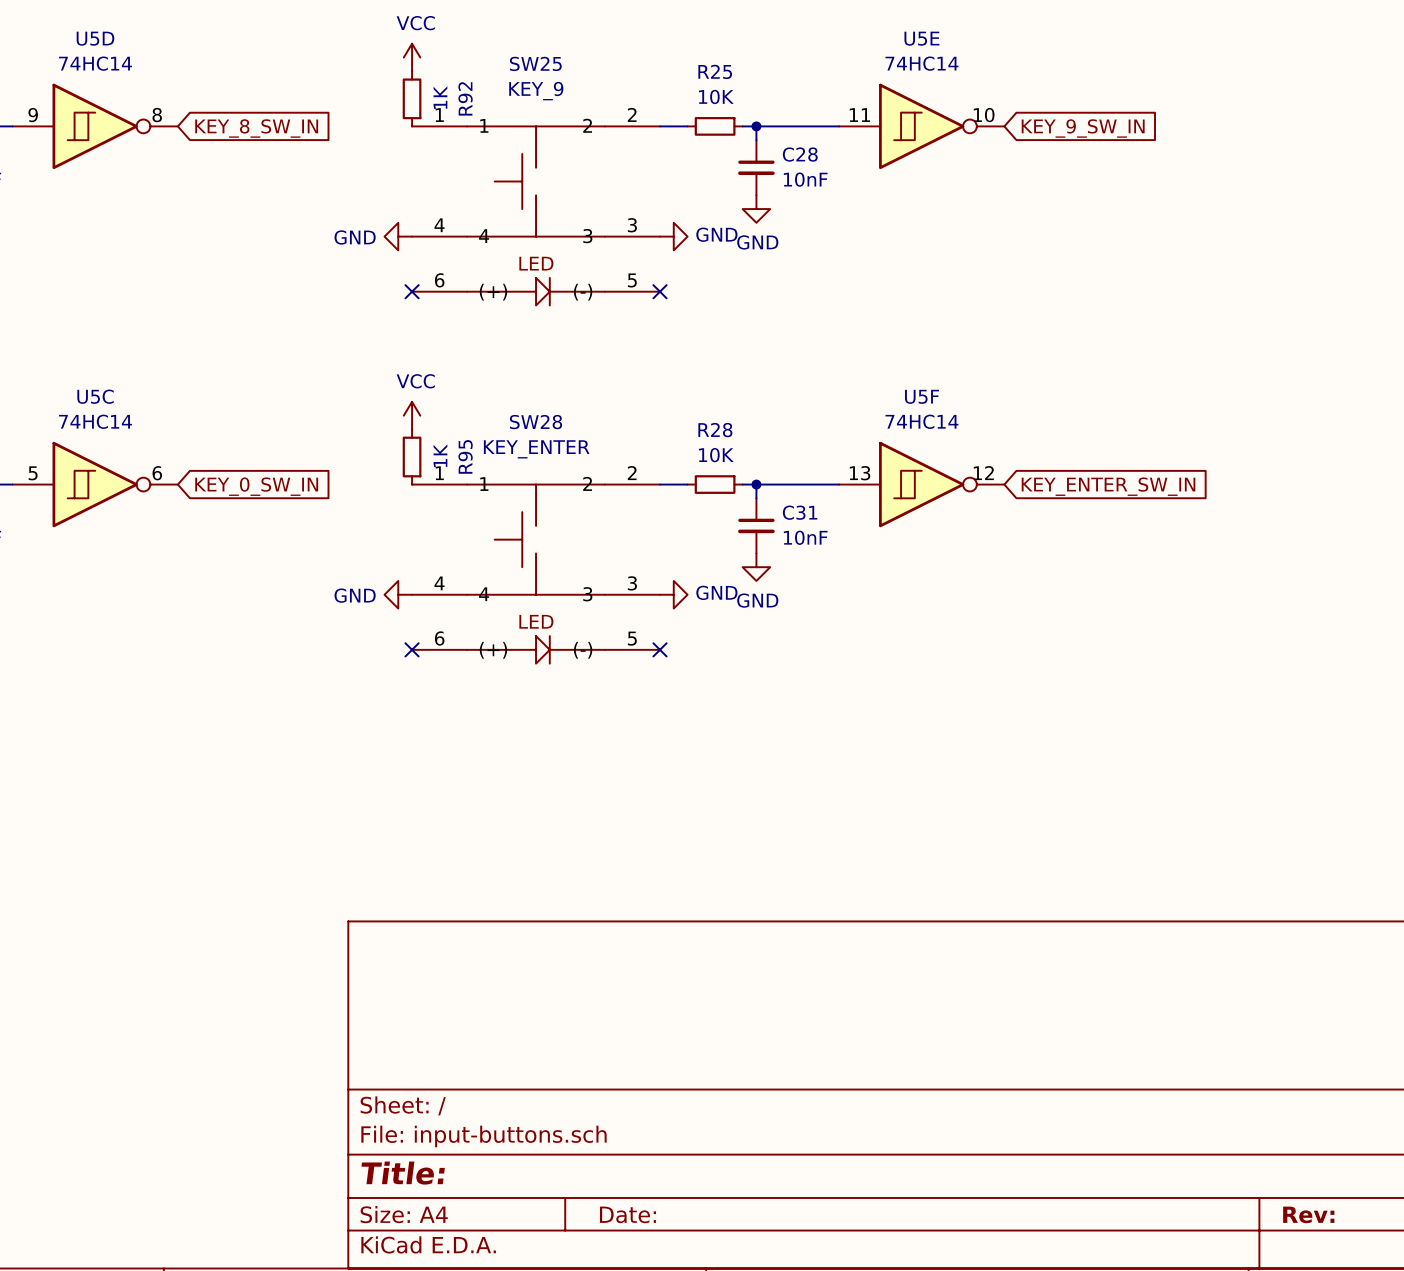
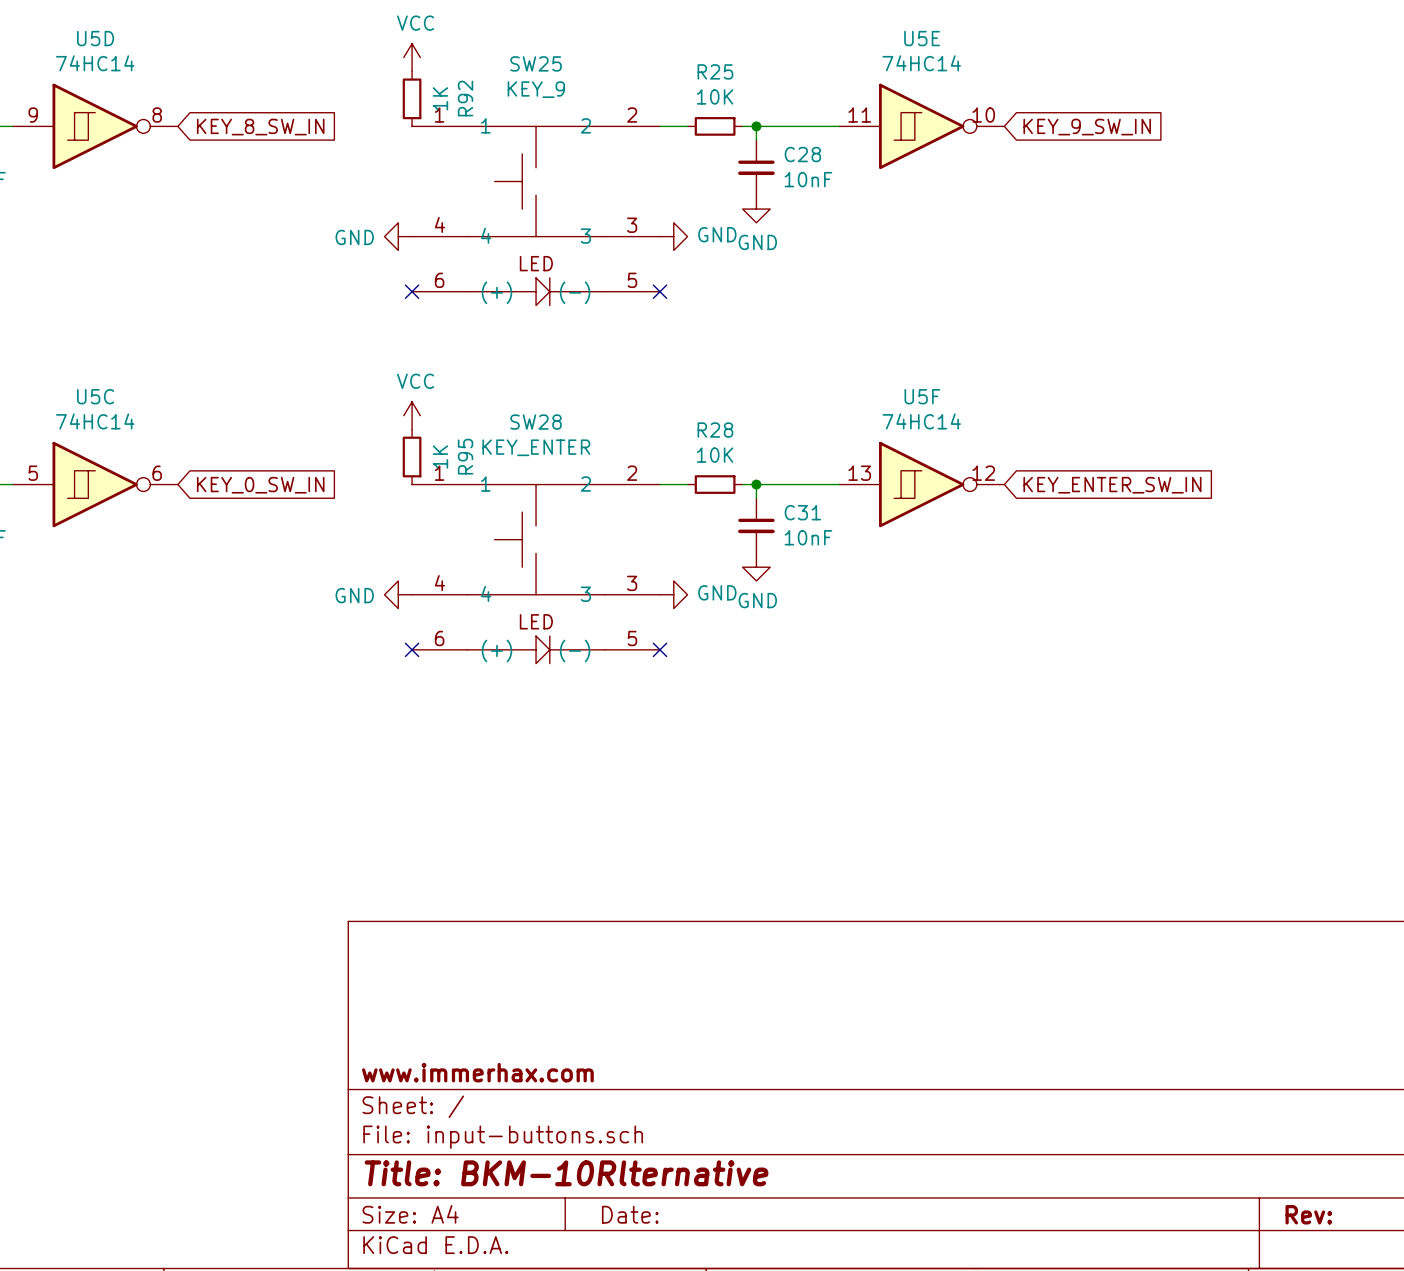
title block: none -> www.immerhax.com (477, 1072)
title block: Title: (403, 1173) -> Title: BKM-10Rlternative (566, 1173)

